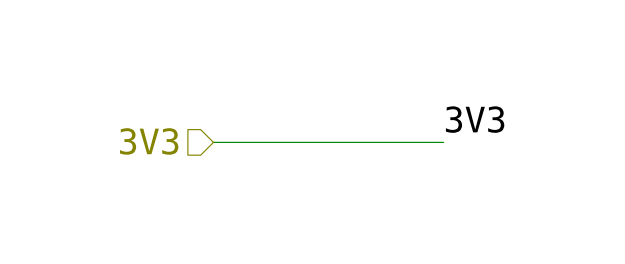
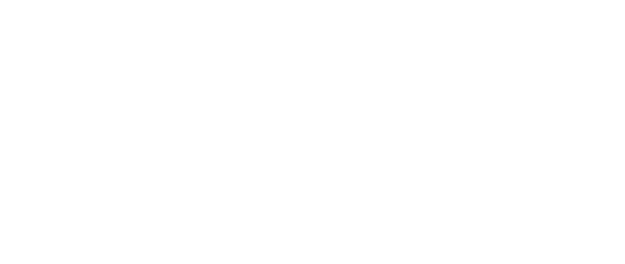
label: 3V3 (475, 119) -> none
hierarchical label: 3V3 (149, 141) -> none
wire: (213, 142) (443, 142) -> none

